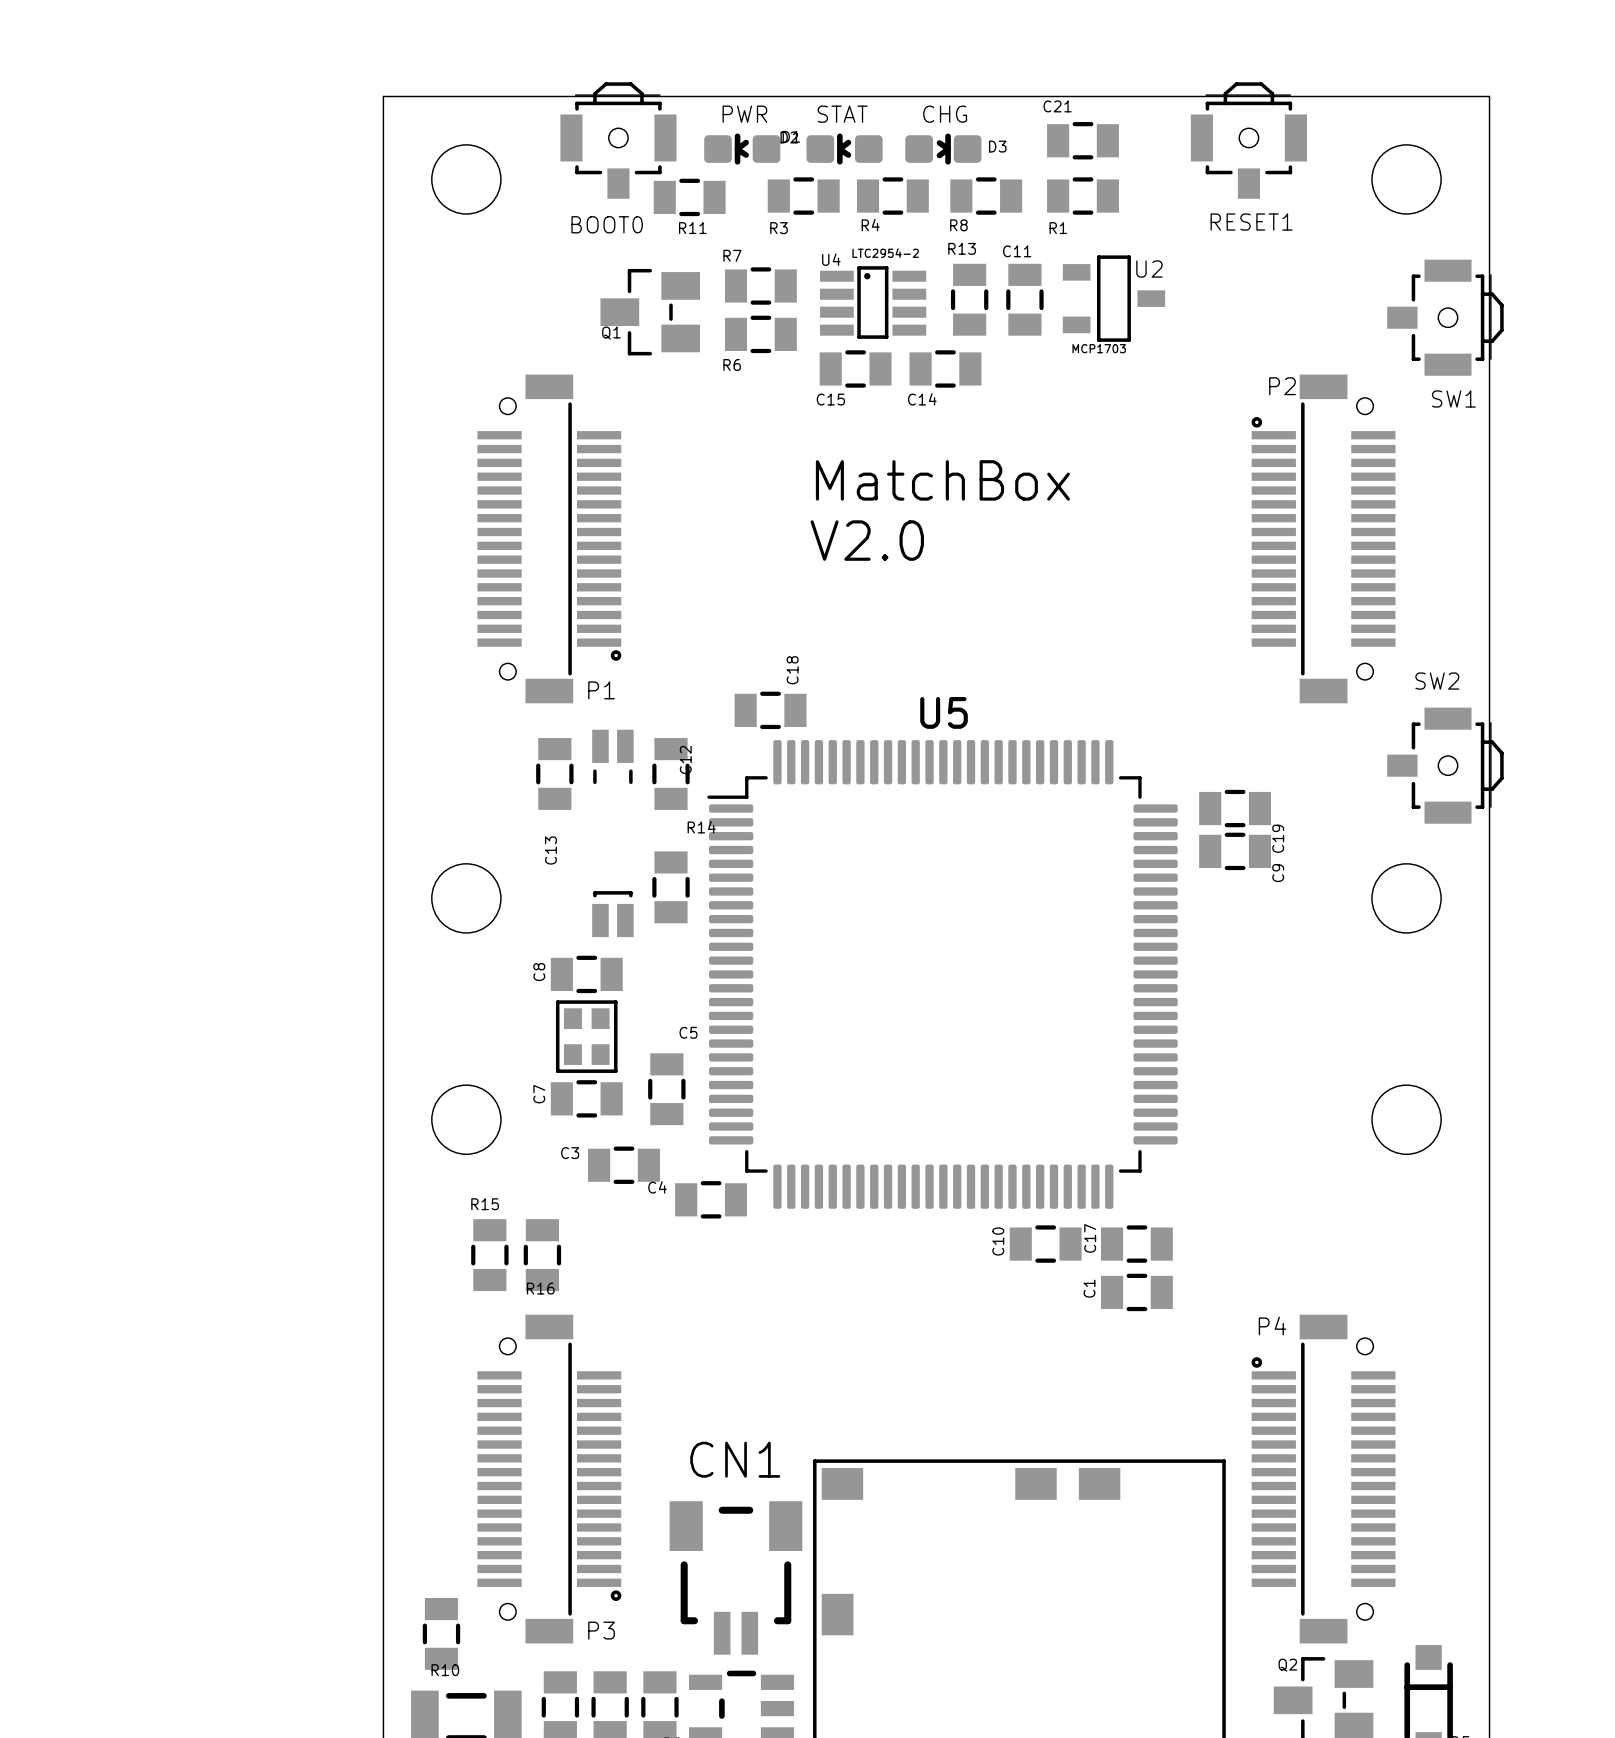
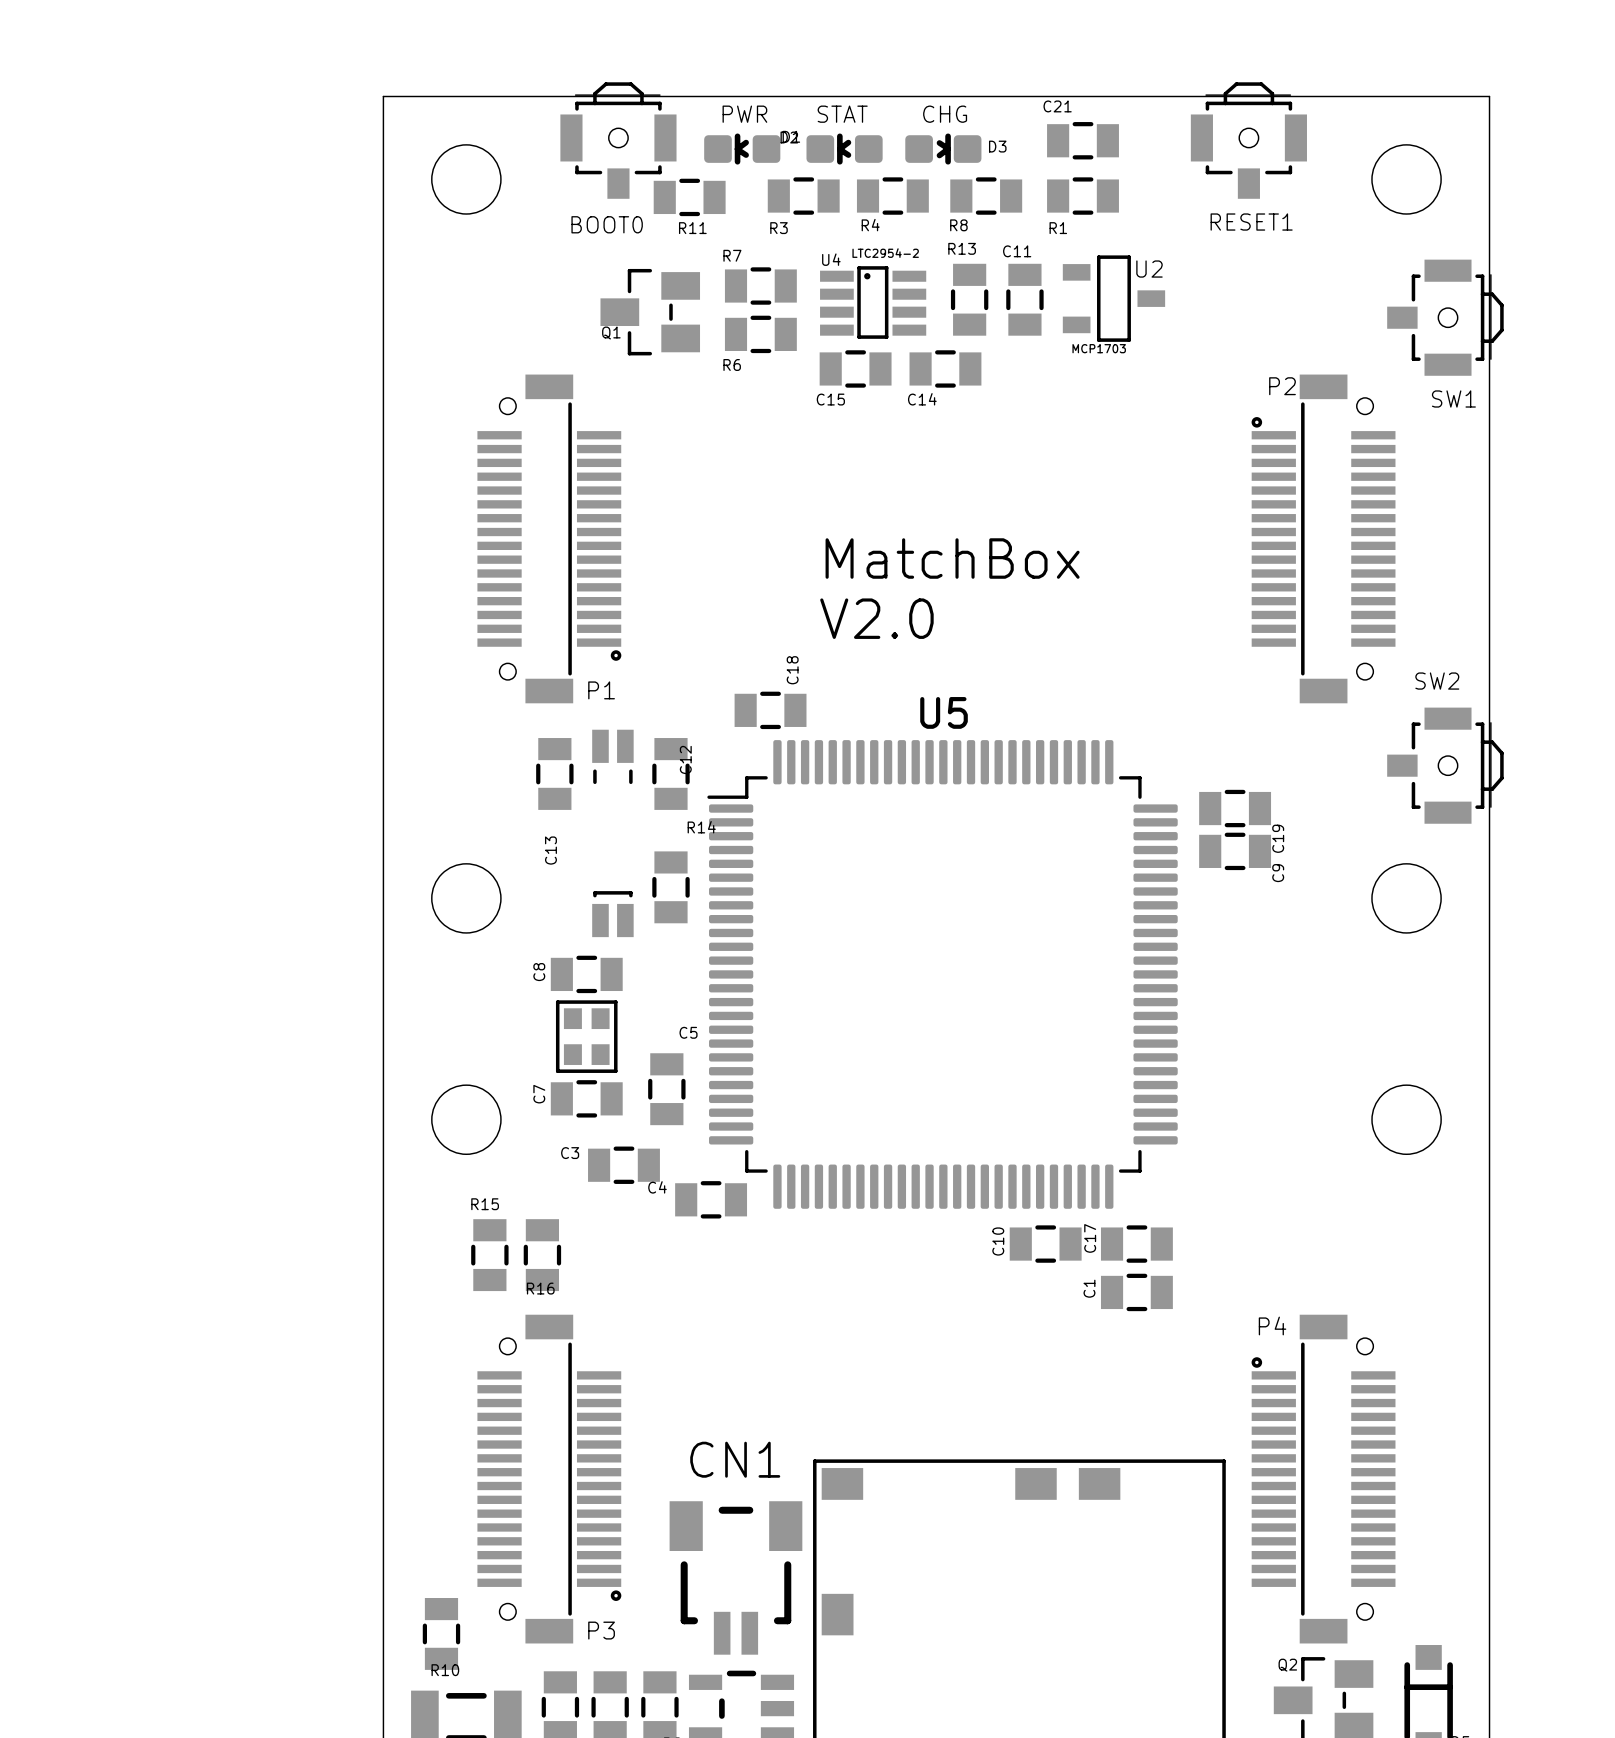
text: MatchBox (942, 480) -> none
text: V2.0 (867, 540) -> MatchBox (952, 558)
text: none -> V2.0 (876, 618)

